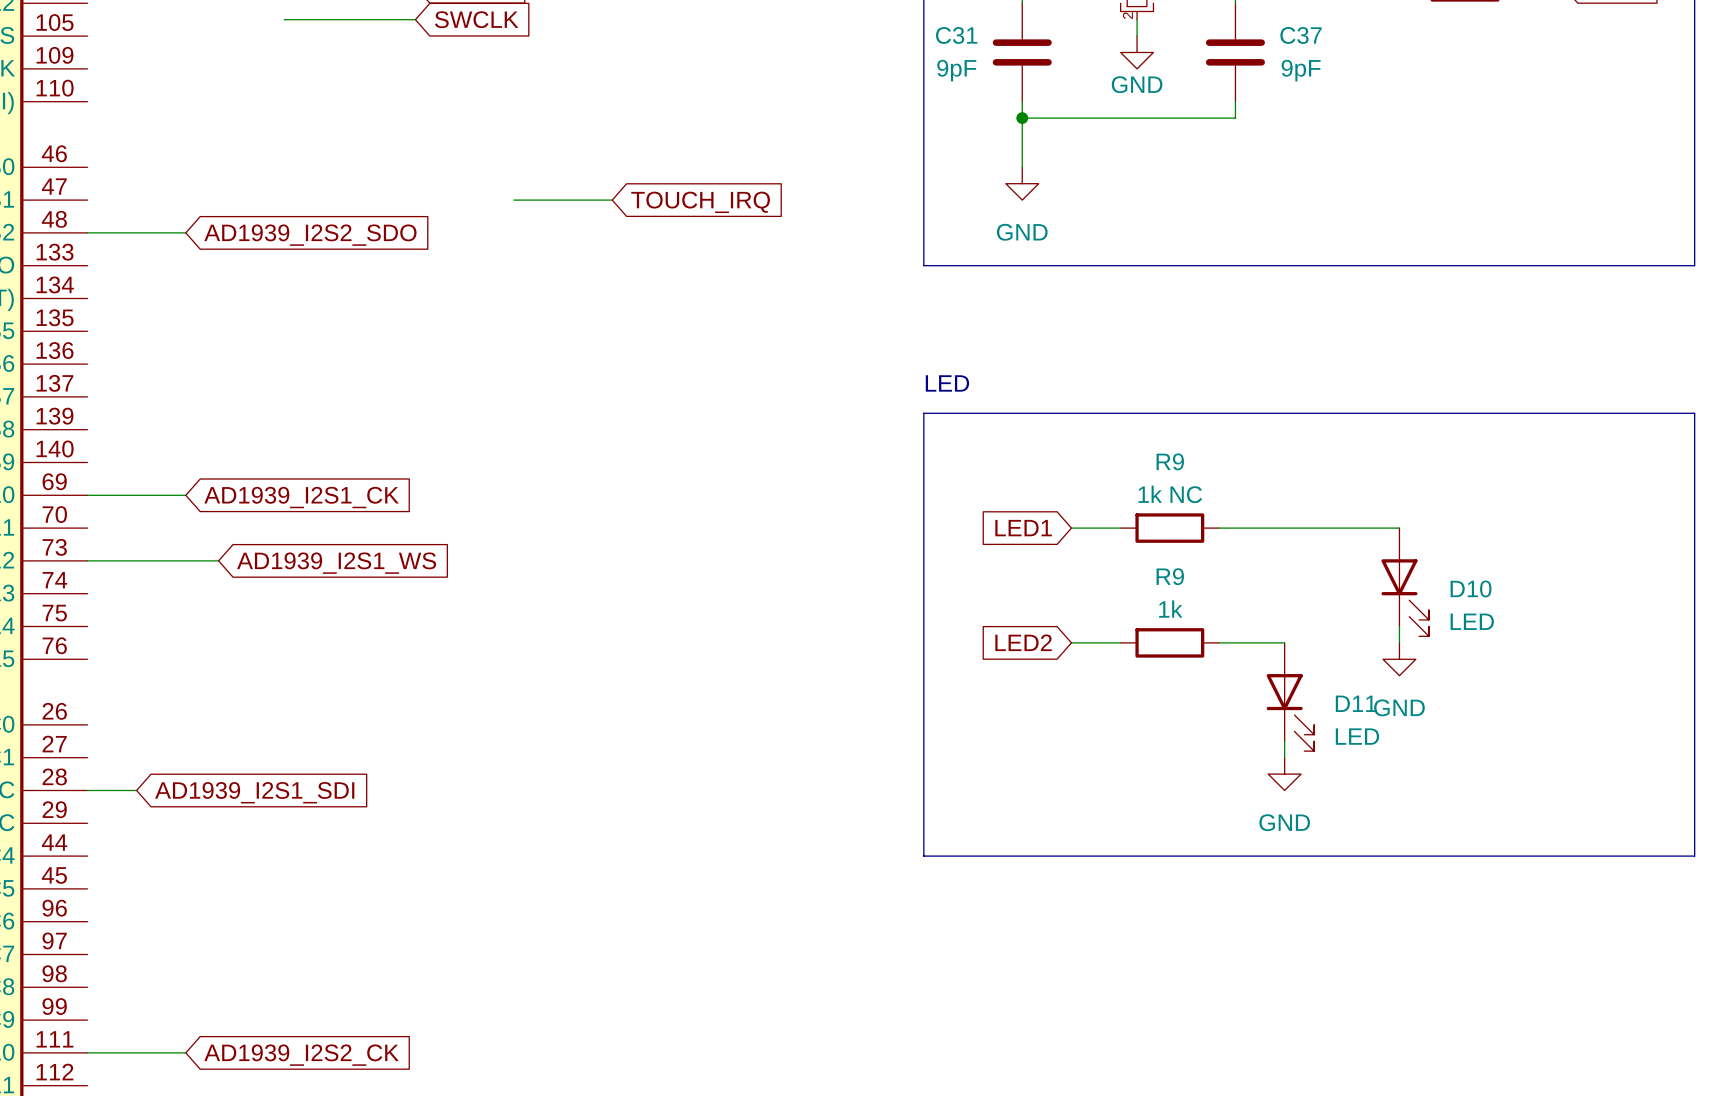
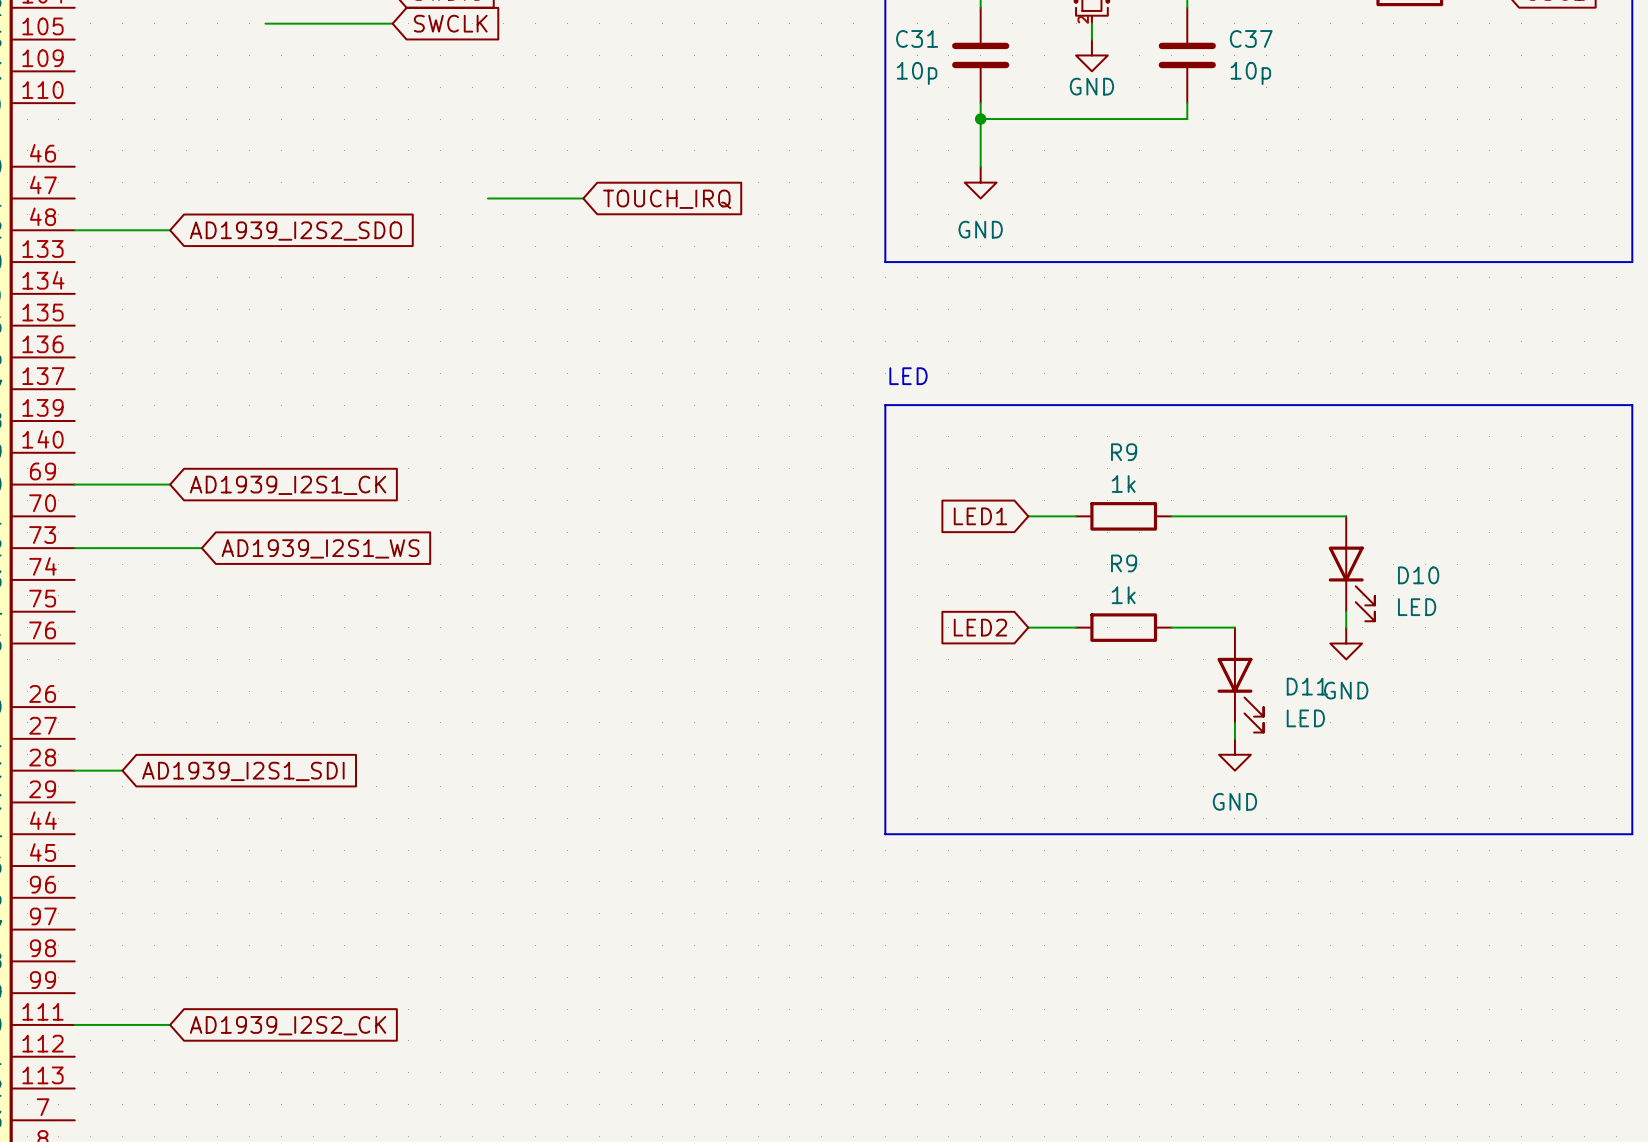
C31 value: 9pF (956, 70) -> 10p (917, 73)
C37 value: 9pF (1301, 70) -> 10p (1250, 73)
R9 value: 1k NC (1170, 494) -> 1k (1123, 483)

